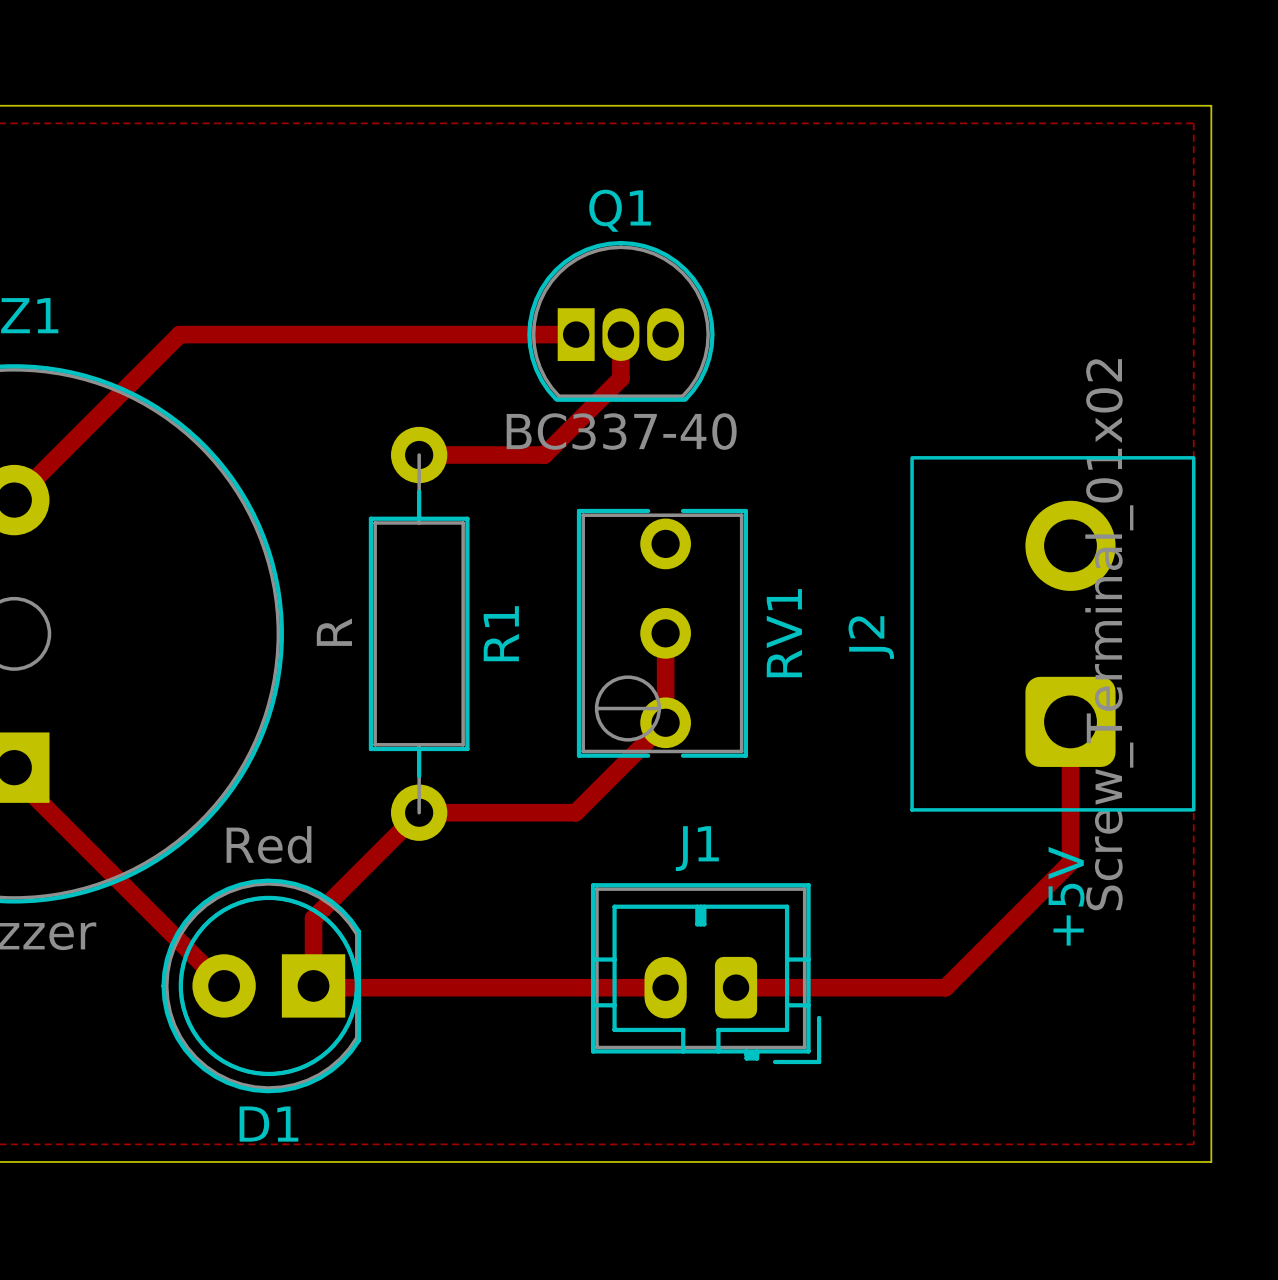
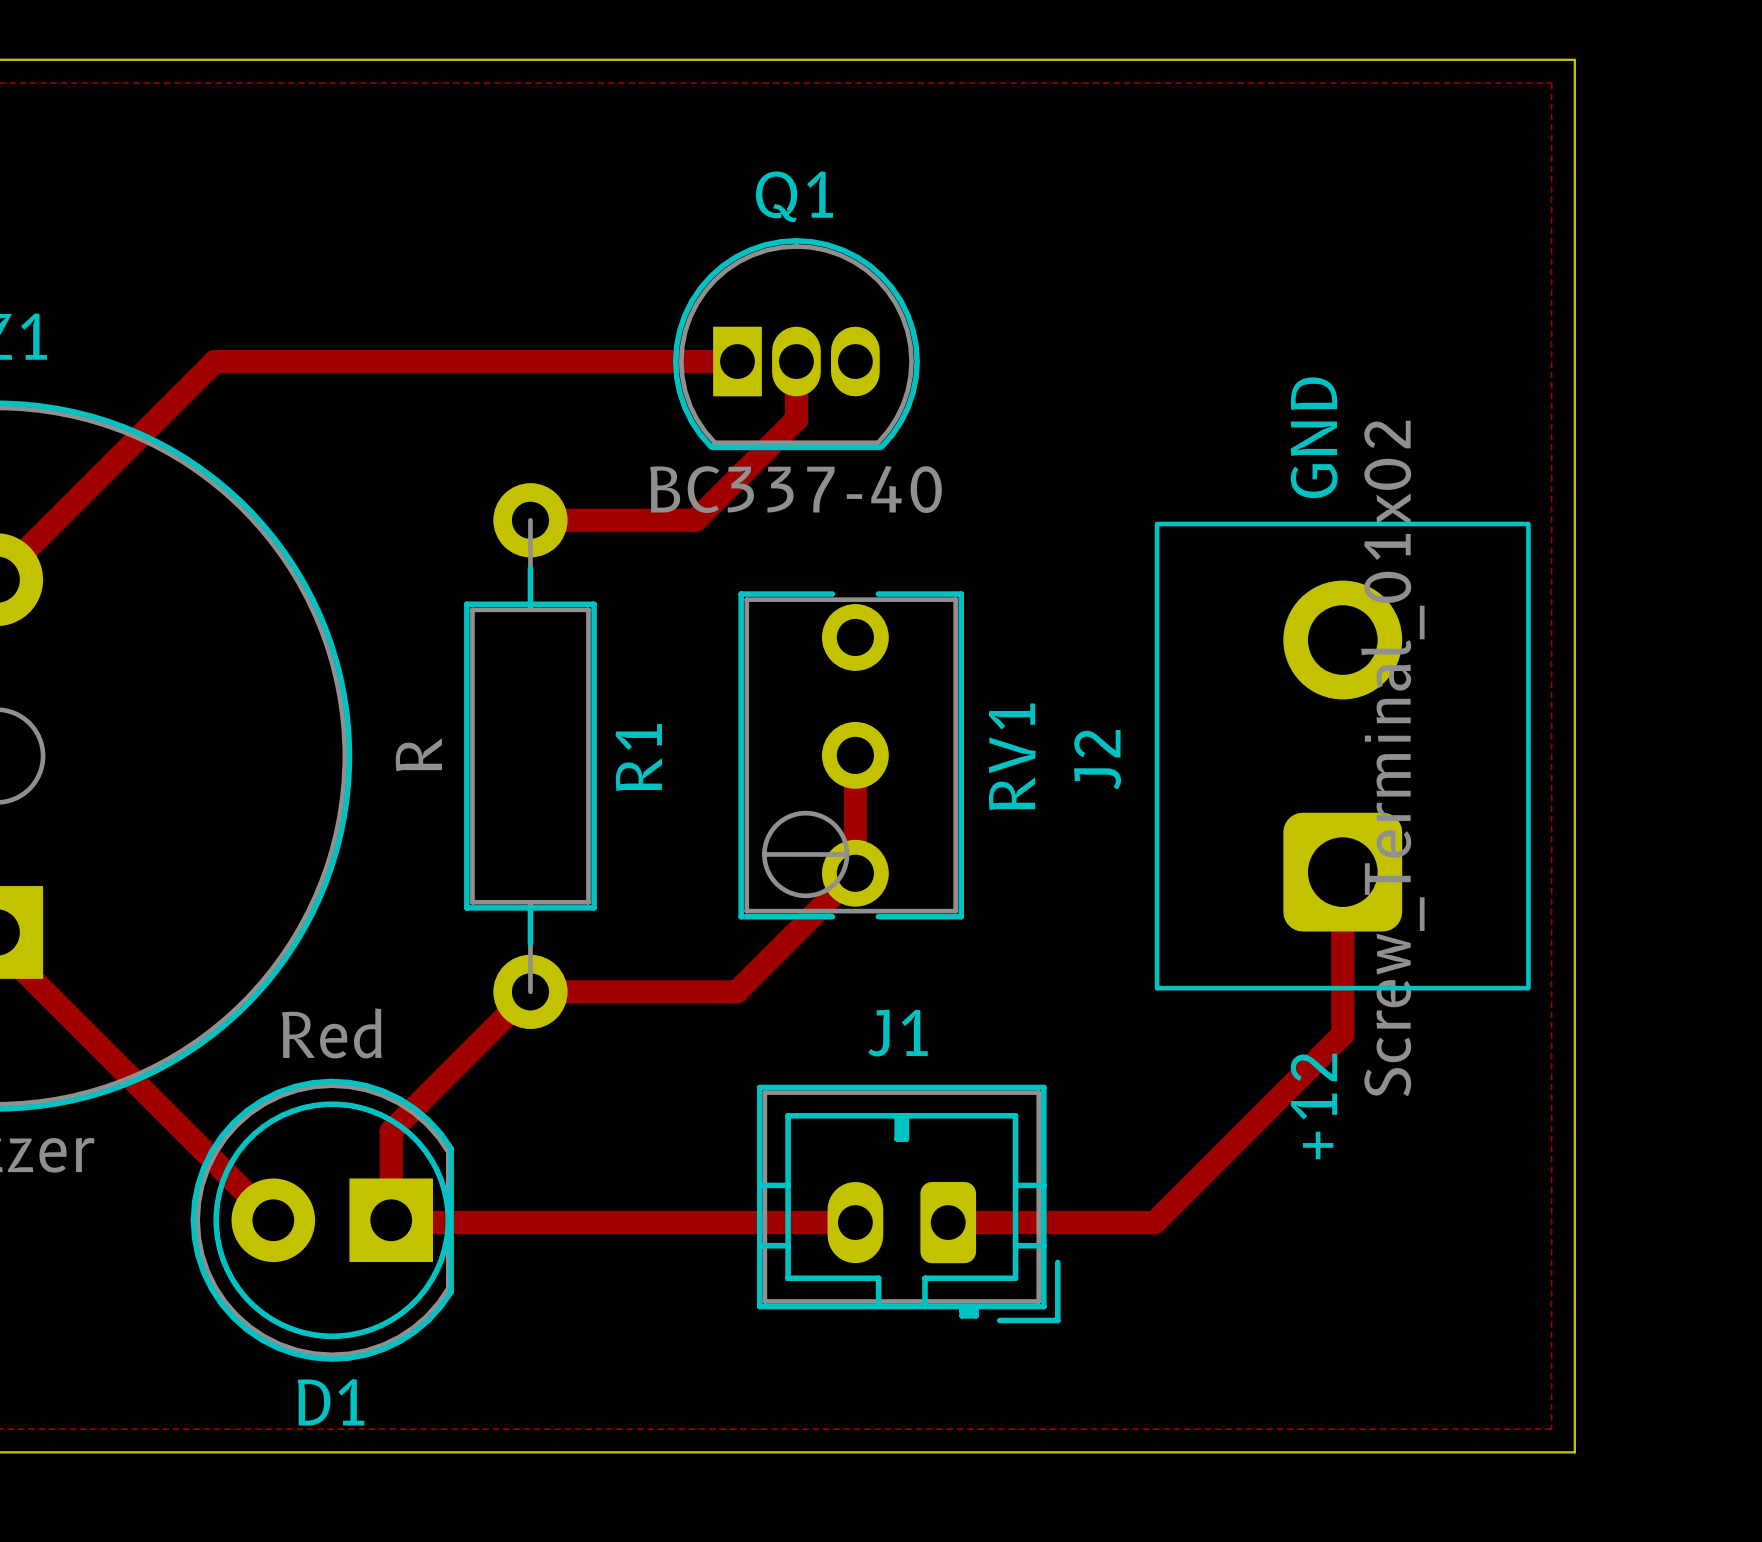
J2 footprint: [910, 456, 1196, 812] -> [1154, 521, 1531, 991]
track: (1070, 721) (1070, 862) (945, 987) (892, 987) -> (1342, 872) (1342, 1034) (1154, 1222)
text: +5V (1066, 896) -> none

